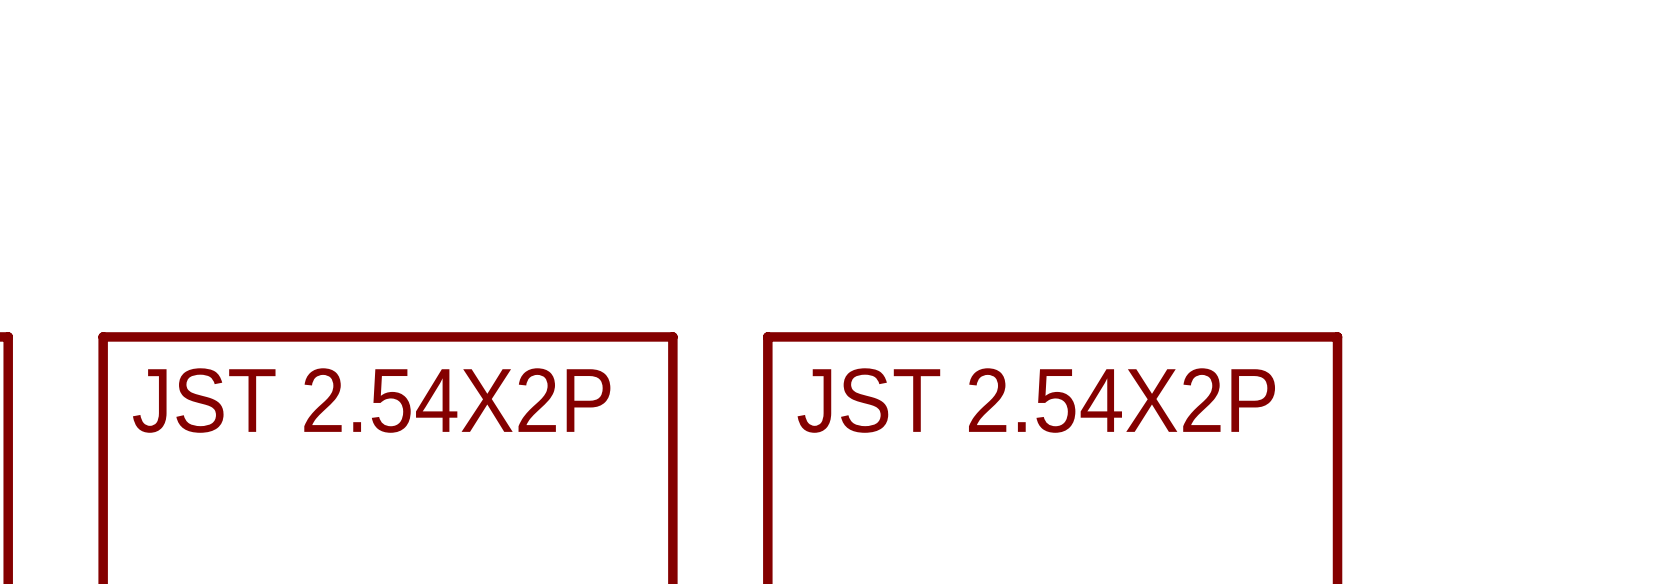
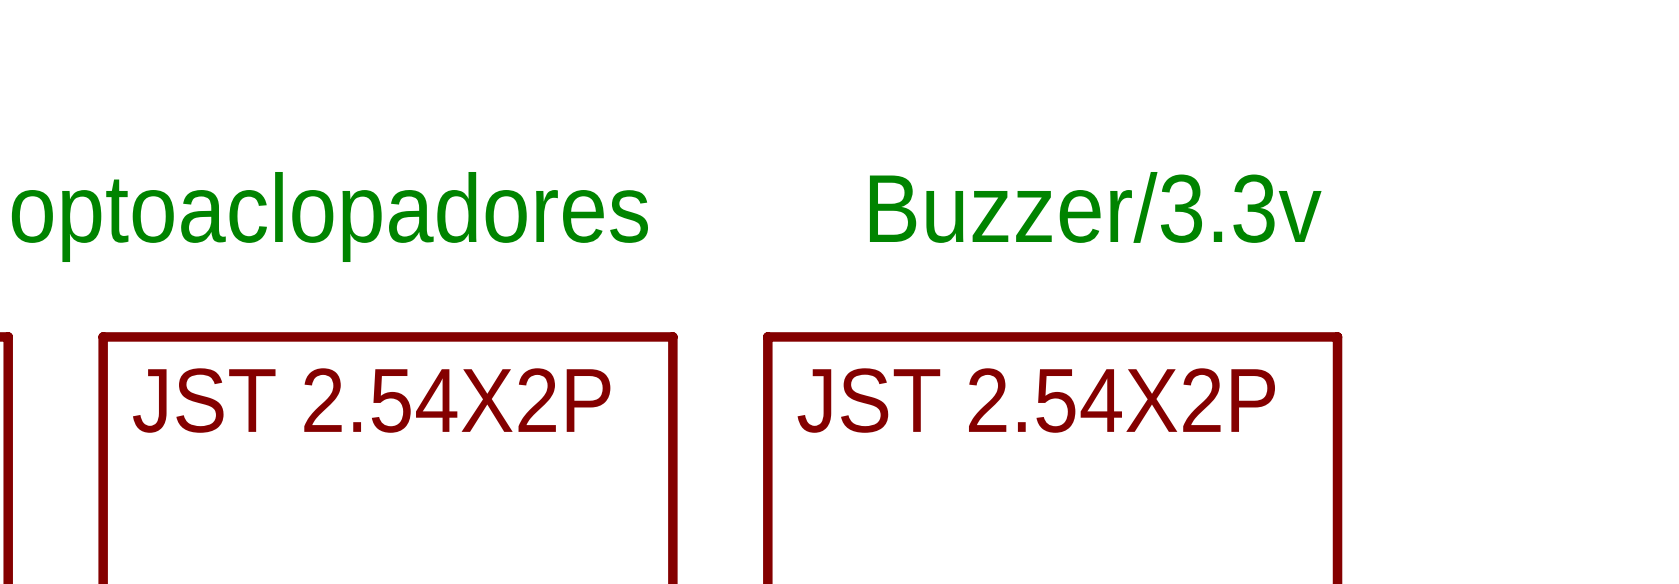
text: none -> Buzzer/3.3v (1095, 207)
text: none -> optoaclopadores (329, 217)

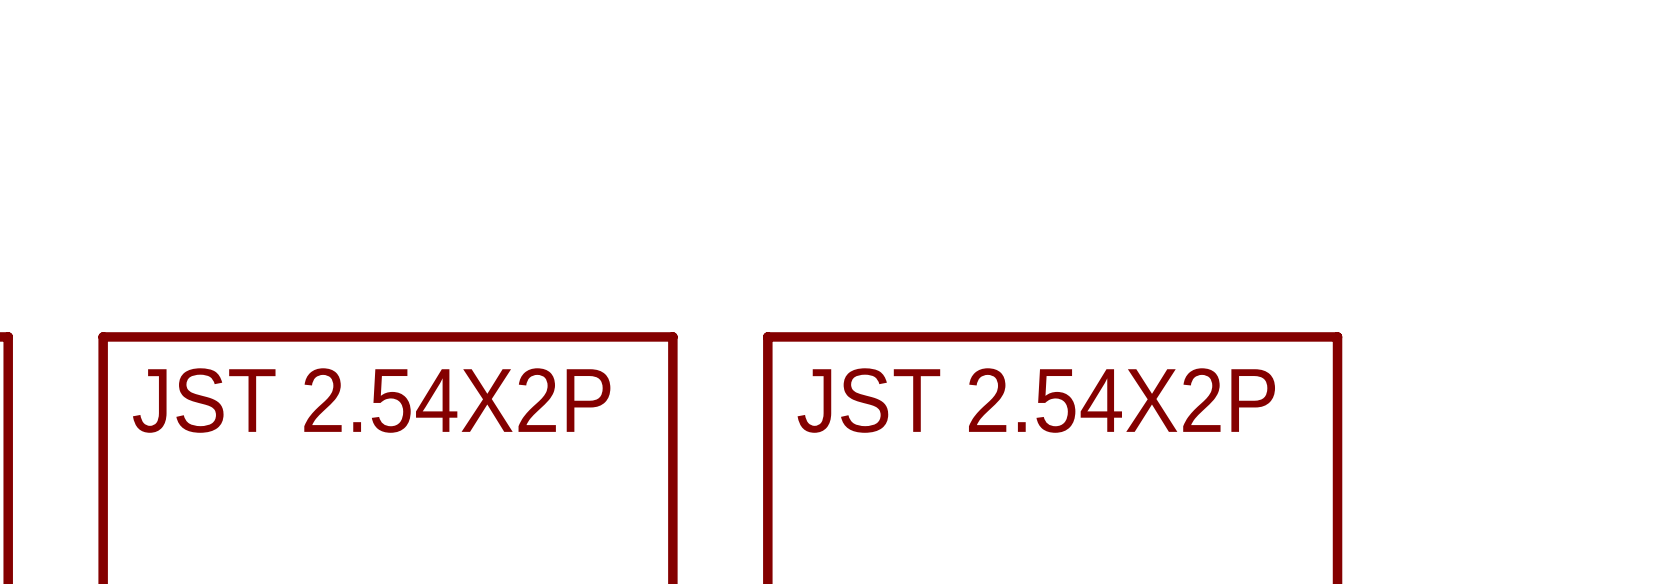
text: Buzzer/3.3v (1095, 207) -> none
text: optoaclopadores (329, 217) -> none

